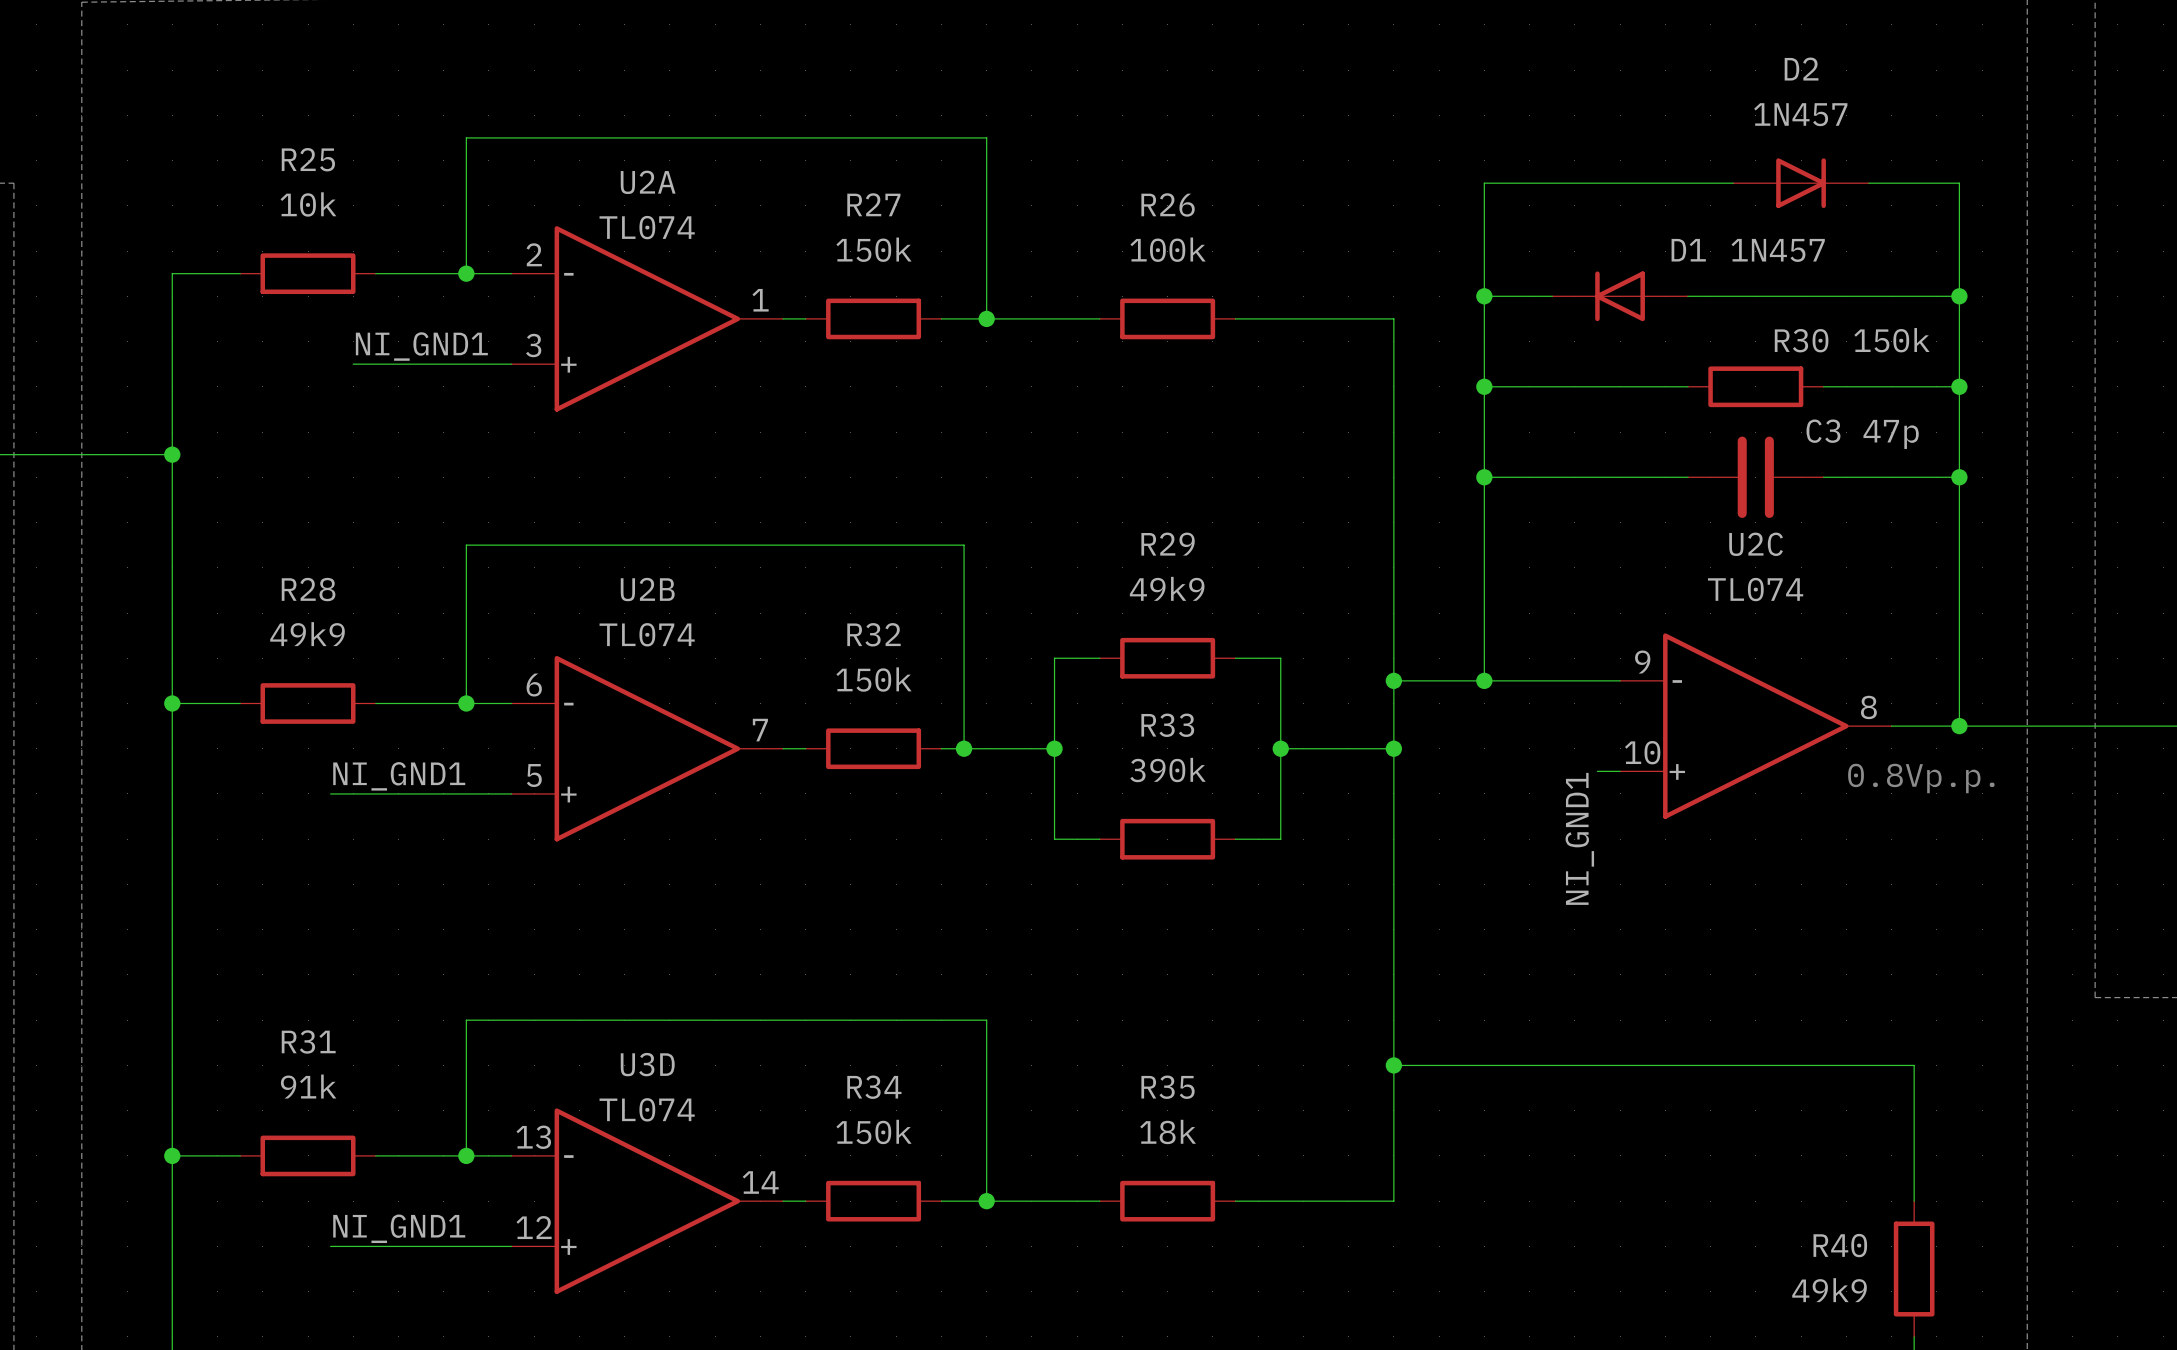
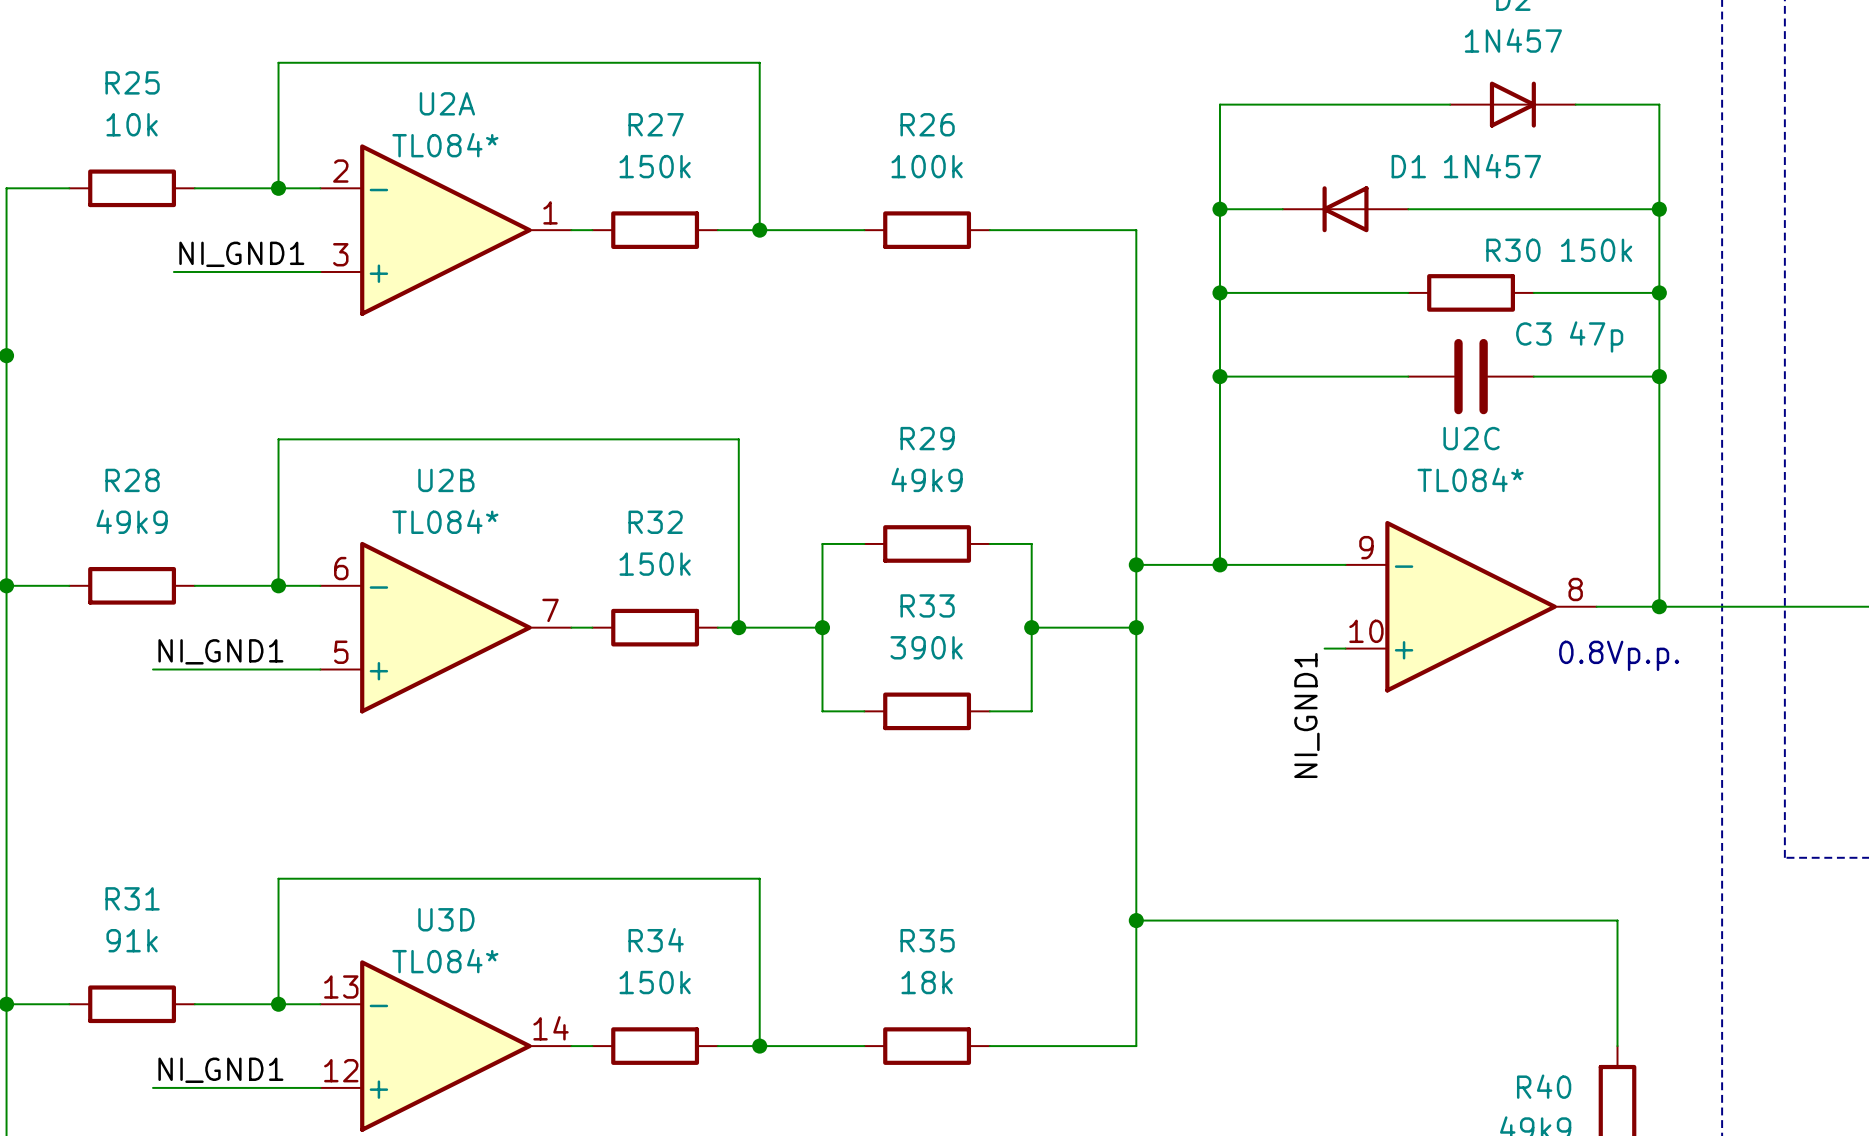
U2A value: TL074 (647, 227) -> TL084* (445, 145)
U2C value: TL074 (1755, 589) -> TL084* (1470, 479)
U2B value: TL074 (647, 634) -> TL084* (445, 521)
U3D value: TL074 (647, 1109) -> TL084* (445, 961)

